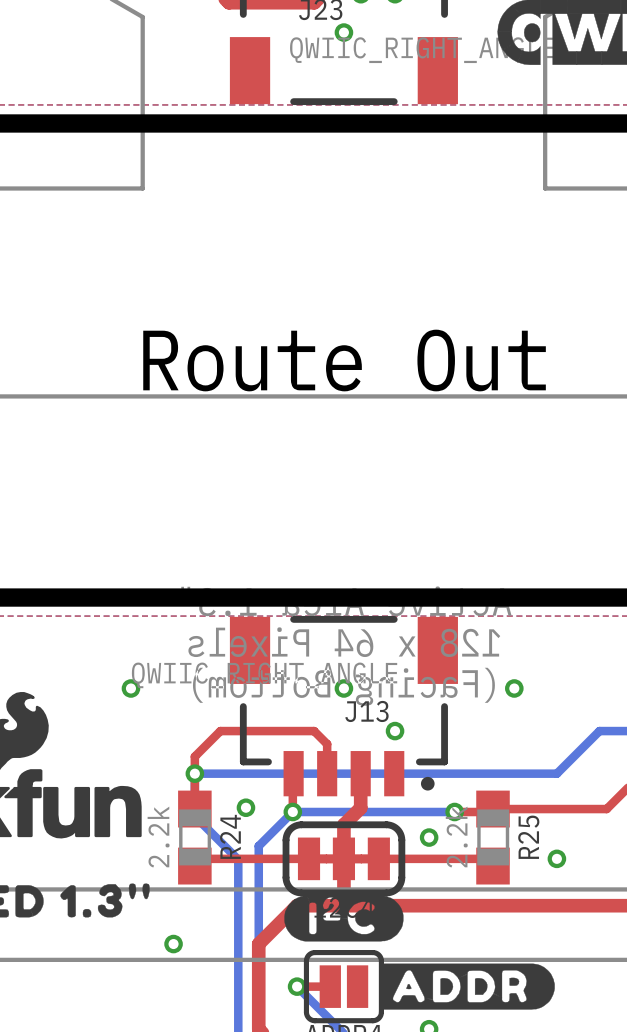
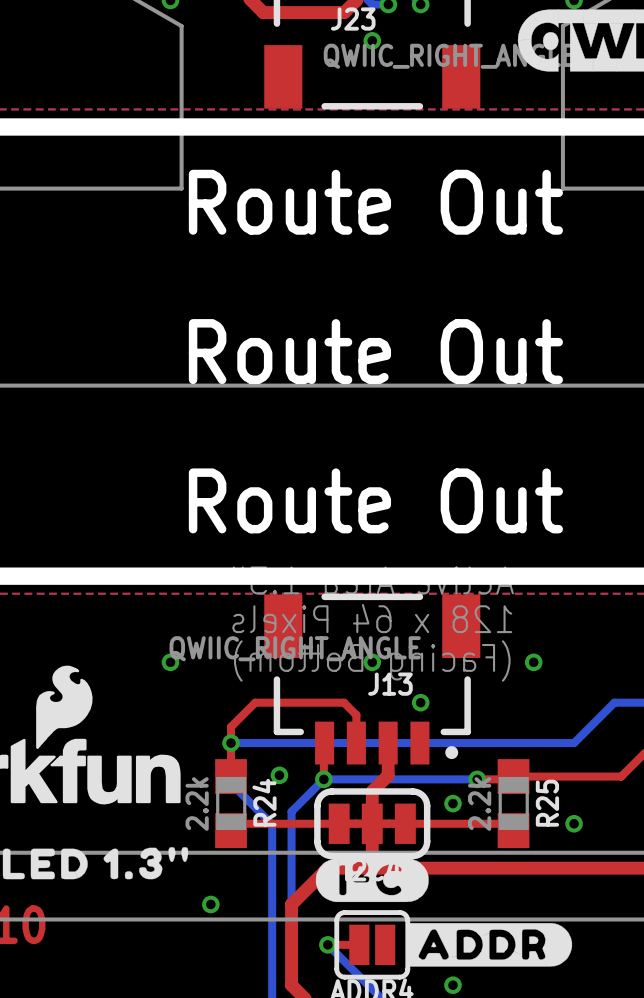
text: none -> Route Out (375, 202)
text: none -> Route Out (375, 500)

